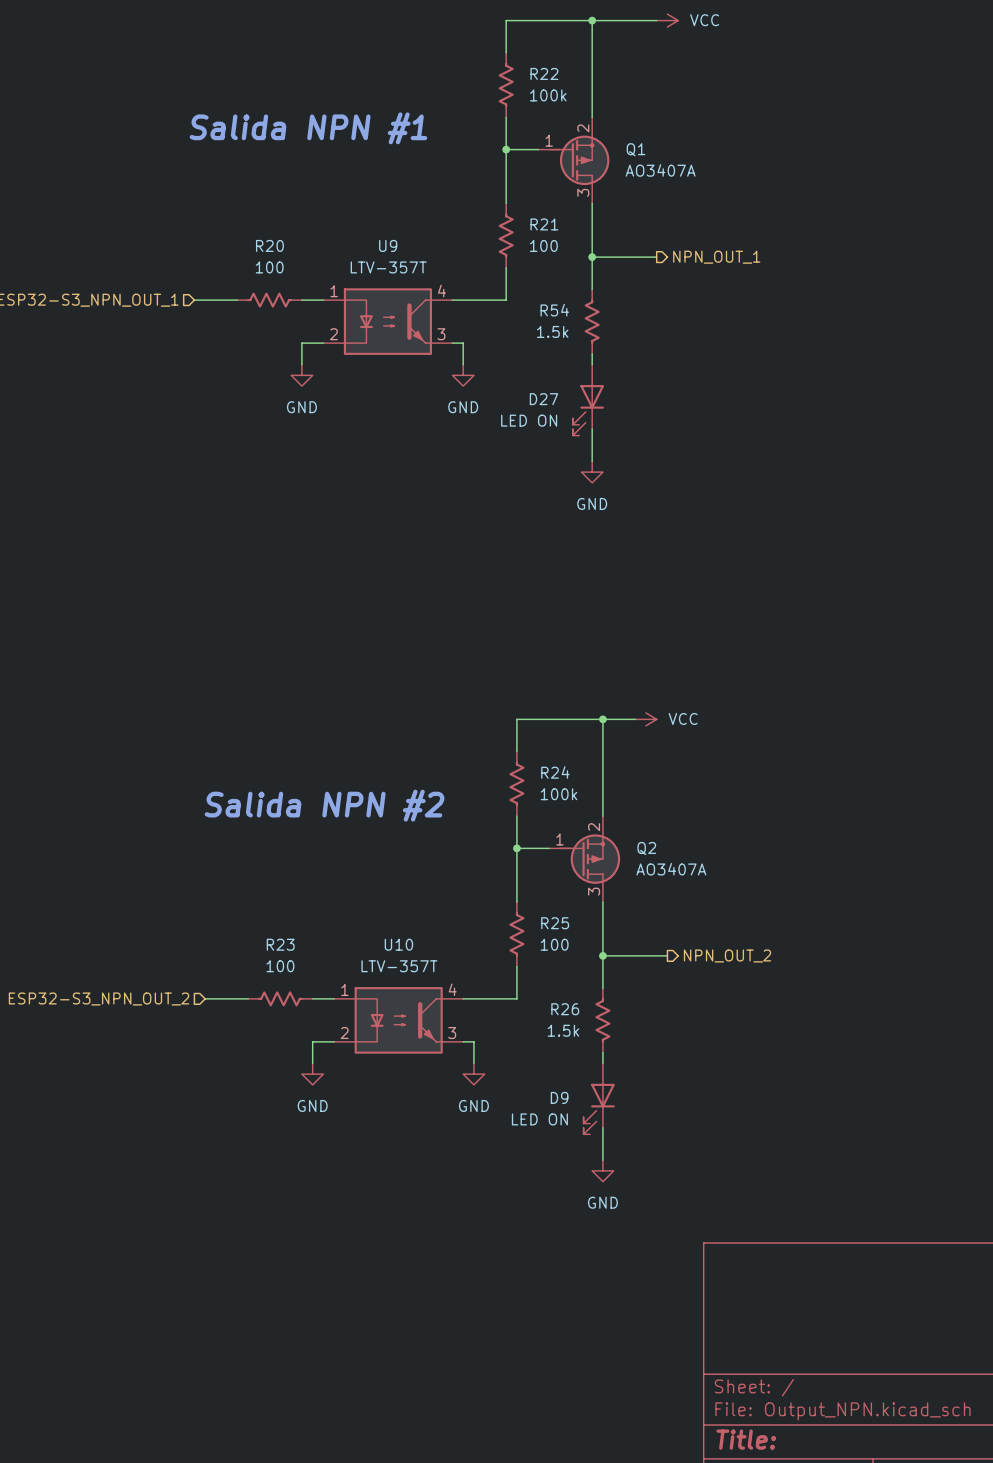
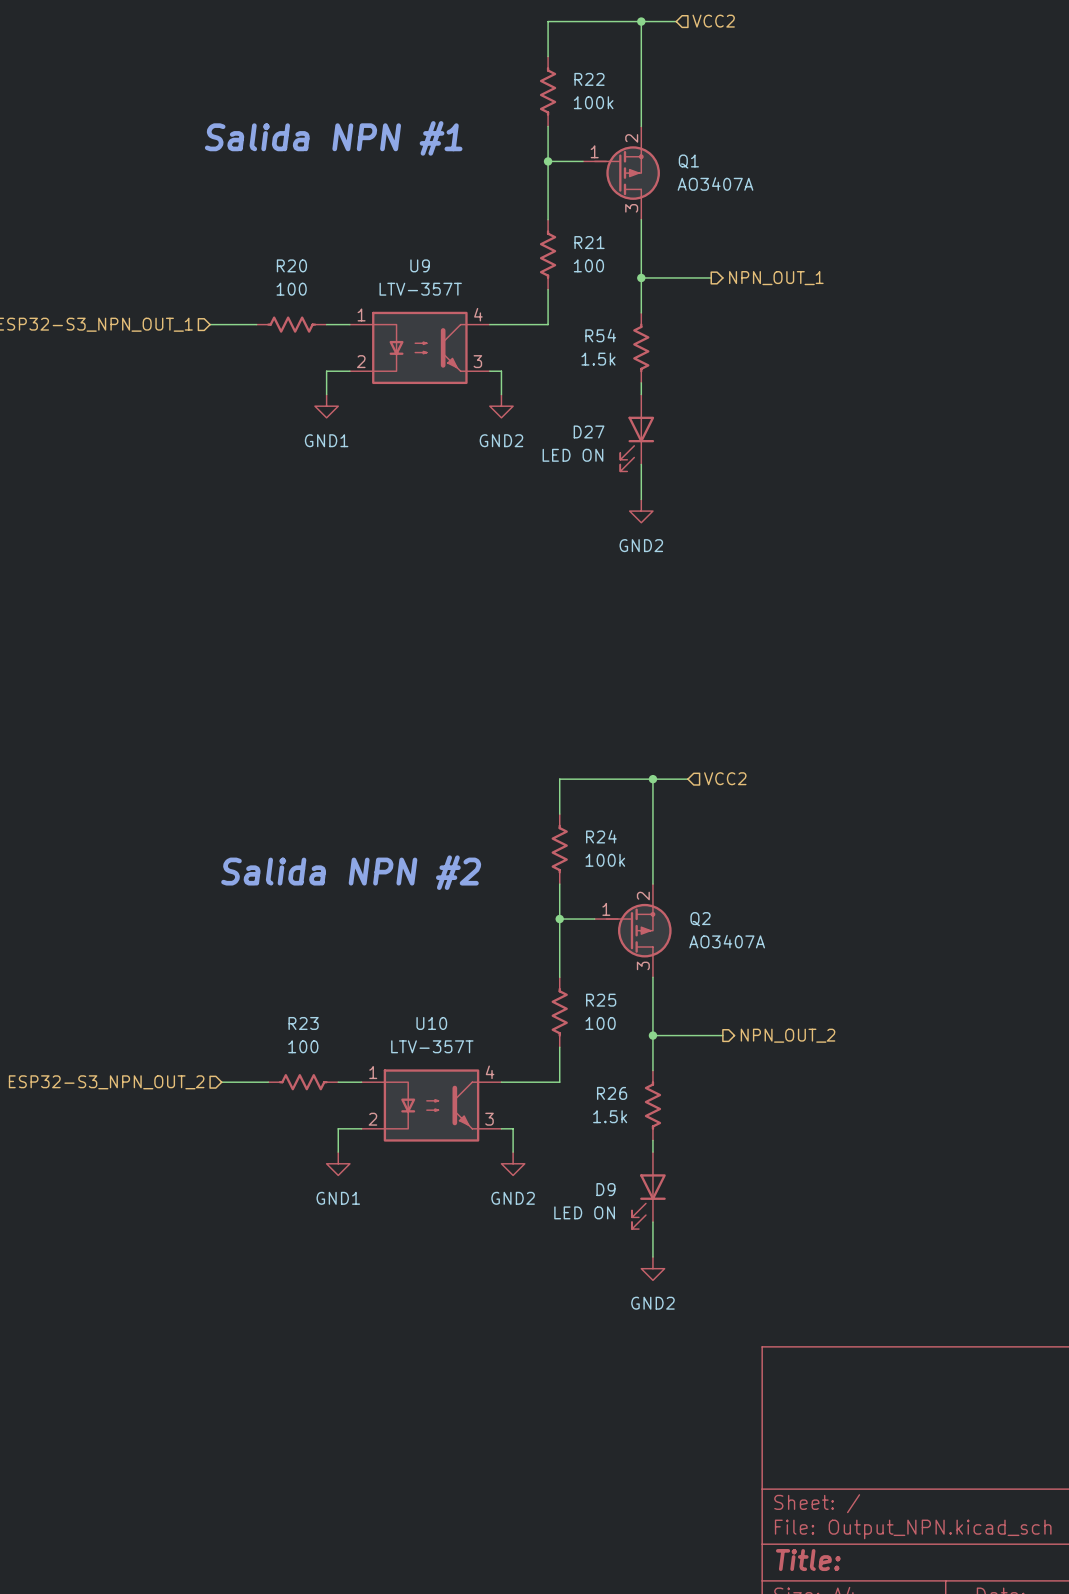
wire: (624, 20) (656, 20) -> none
hierarchical label: none -> VCC2 (713, 21)
power symbol: VCC (667, 20) -> none
power symbol: GND (301, 375) -> GND1 (326, 406)
power symbol: GND (463, 375) -> GND2 (501, 406)
power symbol: GND (592, 472) -> GND2 (641, 511)
hierarchical label: none -> VCC2 (725, 778)
power symbol: VCC (645, 719) -> none
power symbol: GND (312, 1074) -> GND1 (338, 1163)
power symbol: GND (473, 1074) -> GND2 (513, 1163)
power symbol: GND (602, 1170) -> GND2 (652, 1268)

